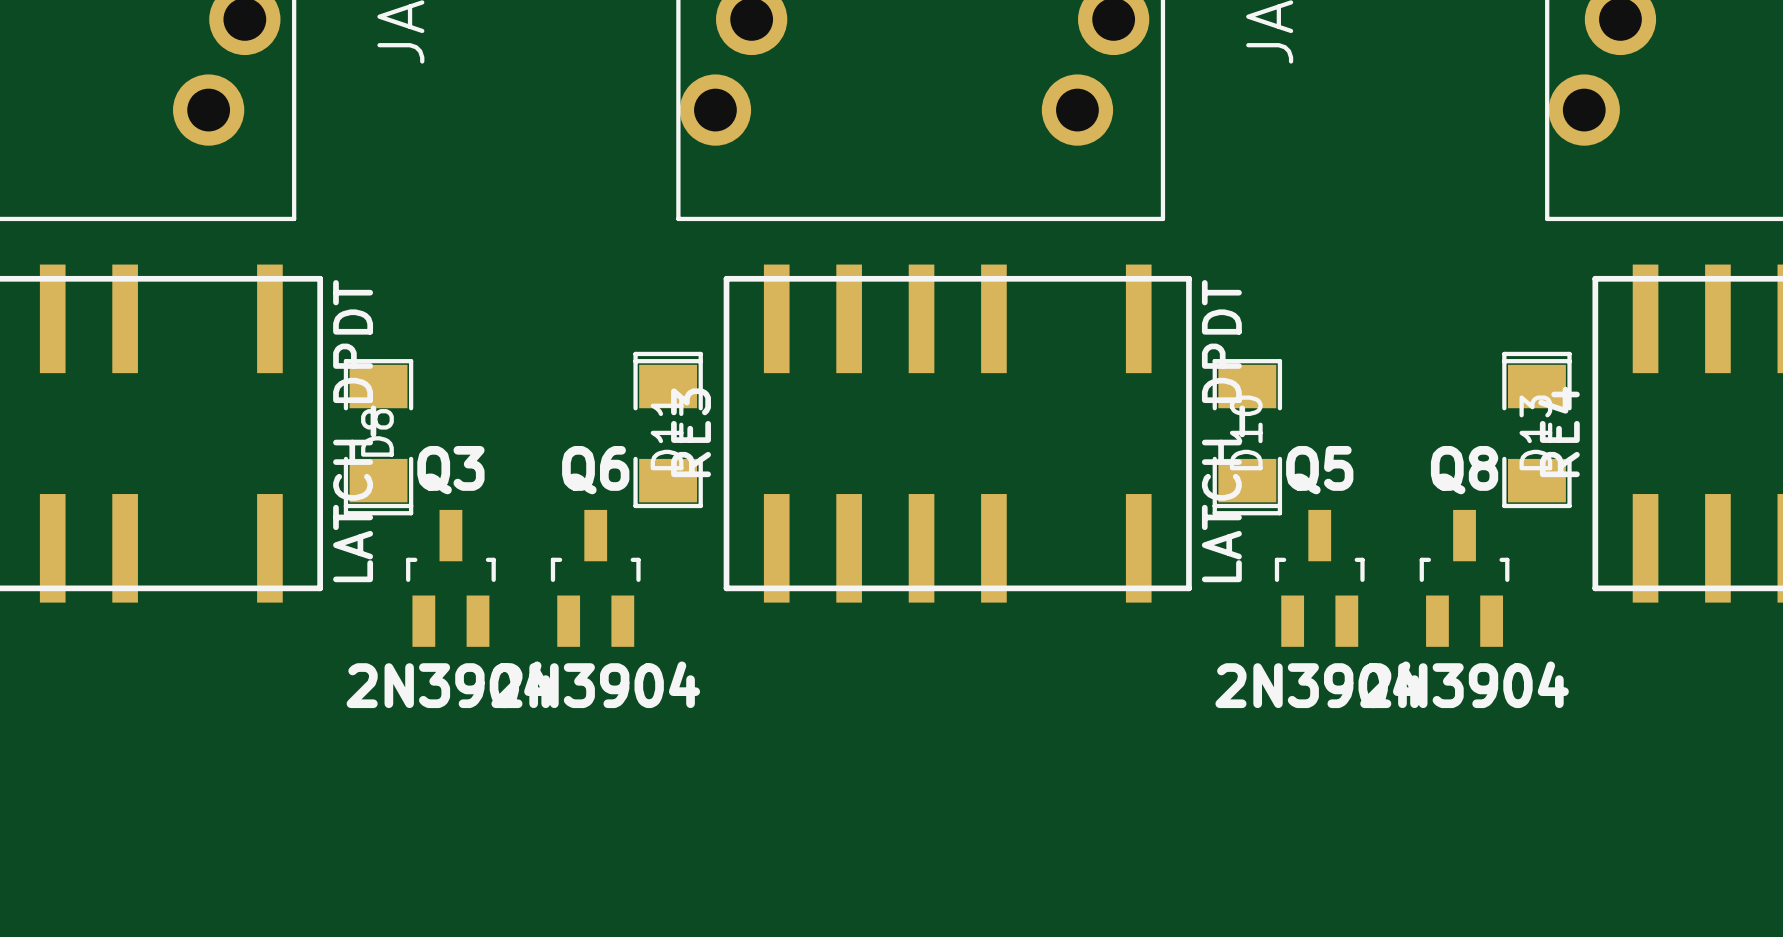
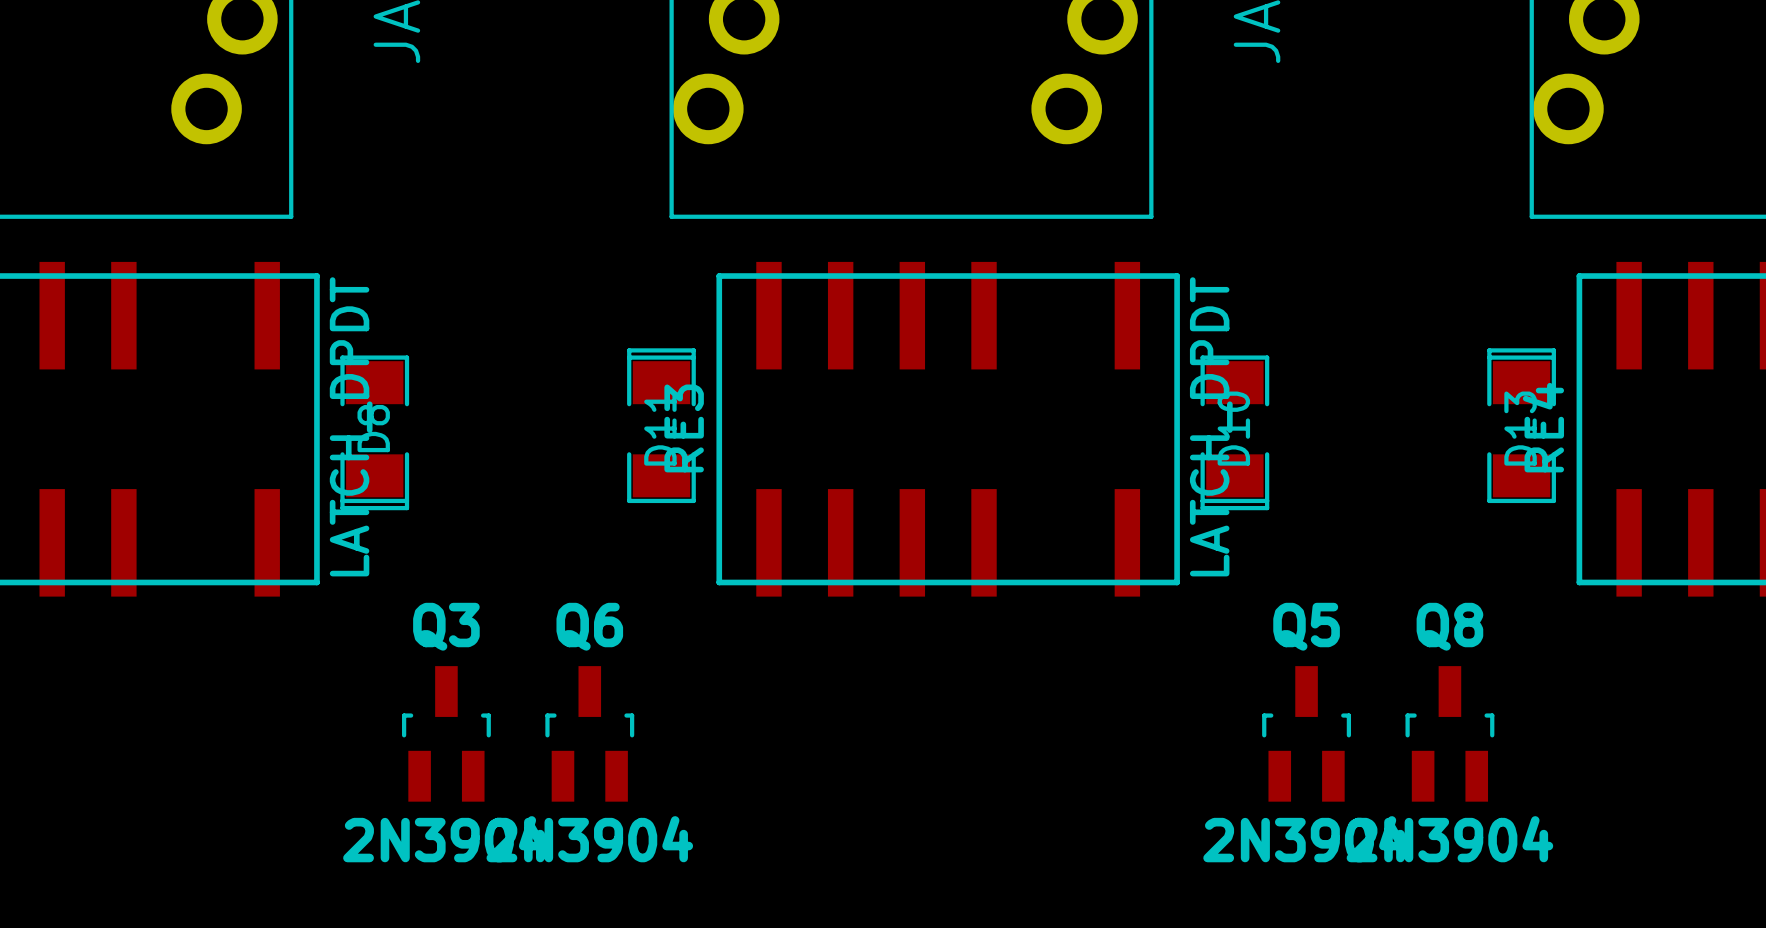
Q3 position: (450, 578) -> (446, 733)
Q6 position: (595, 578) -> (589, 733)
Q5 position: (1319, 578) -> (1306, 733)
Q8 position: (1464, 578) -> (1449, 733)

